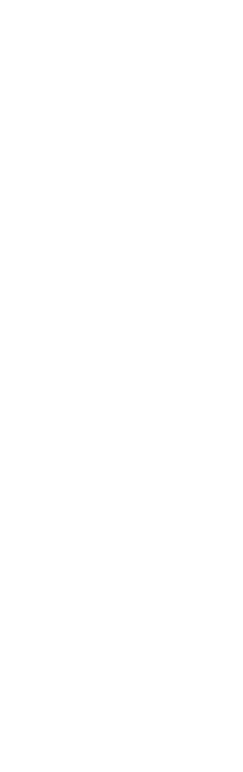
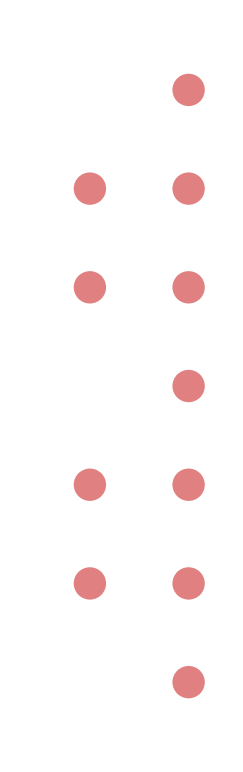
part: none -> (188, 89)
part: none -> (89, 188)
part: none -> (188, 188)
part: none -> (89, 287)
part: none -> (188, 287)
part: none -> (188, 386)
part: none -> (89, 484)
part: none -> (188, 484)
part: none -> (89, 583)
part: none -> (188, 583)
part: none -> (188, 682)

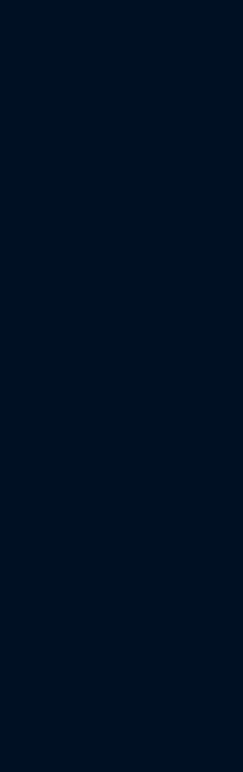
part: (188, 89) -> none
part: (89, 188) -> none
part: (188, 188) -> none
part: (89, 287) -> none
part: (188, 287) -> none
part: (188, 386) -> none
part: (89, 484) -> none
part: (188, 484) -> none
part: (89, 583) -> none
part: (188, 583) -> none
part: (188, 682) -> none

